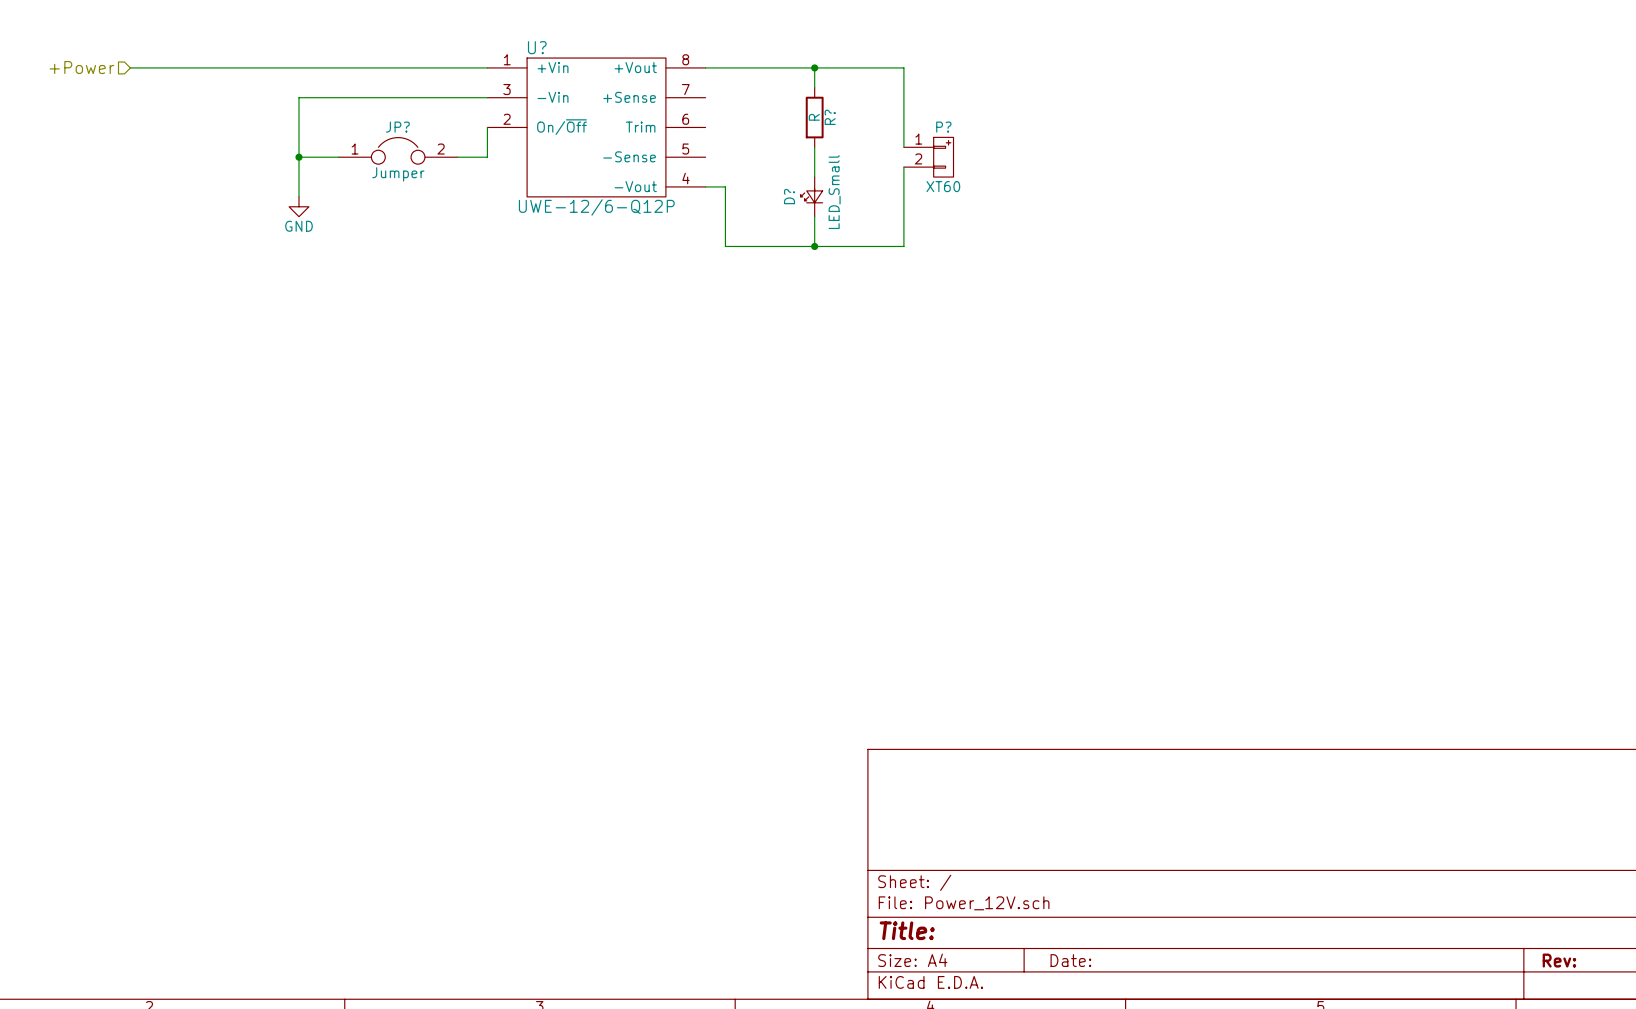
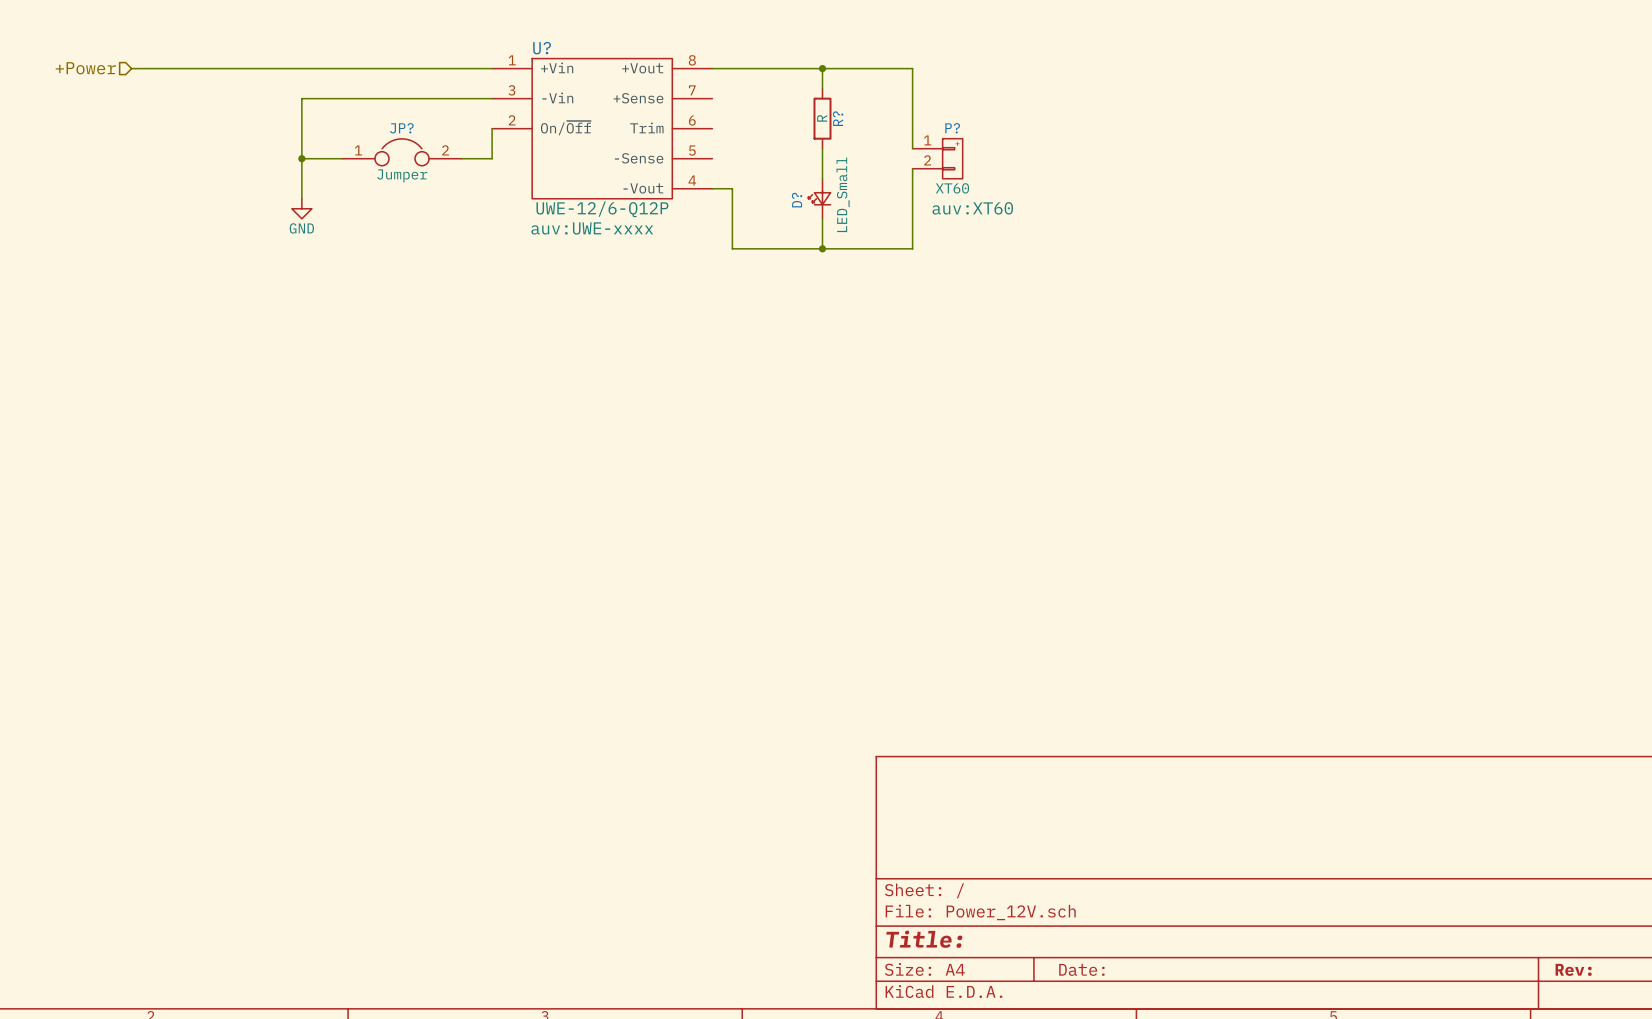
P? text: none -> auv:XT60 (972, 208)
U? text: none -> auv:UWE-xxxx (592, 228)

